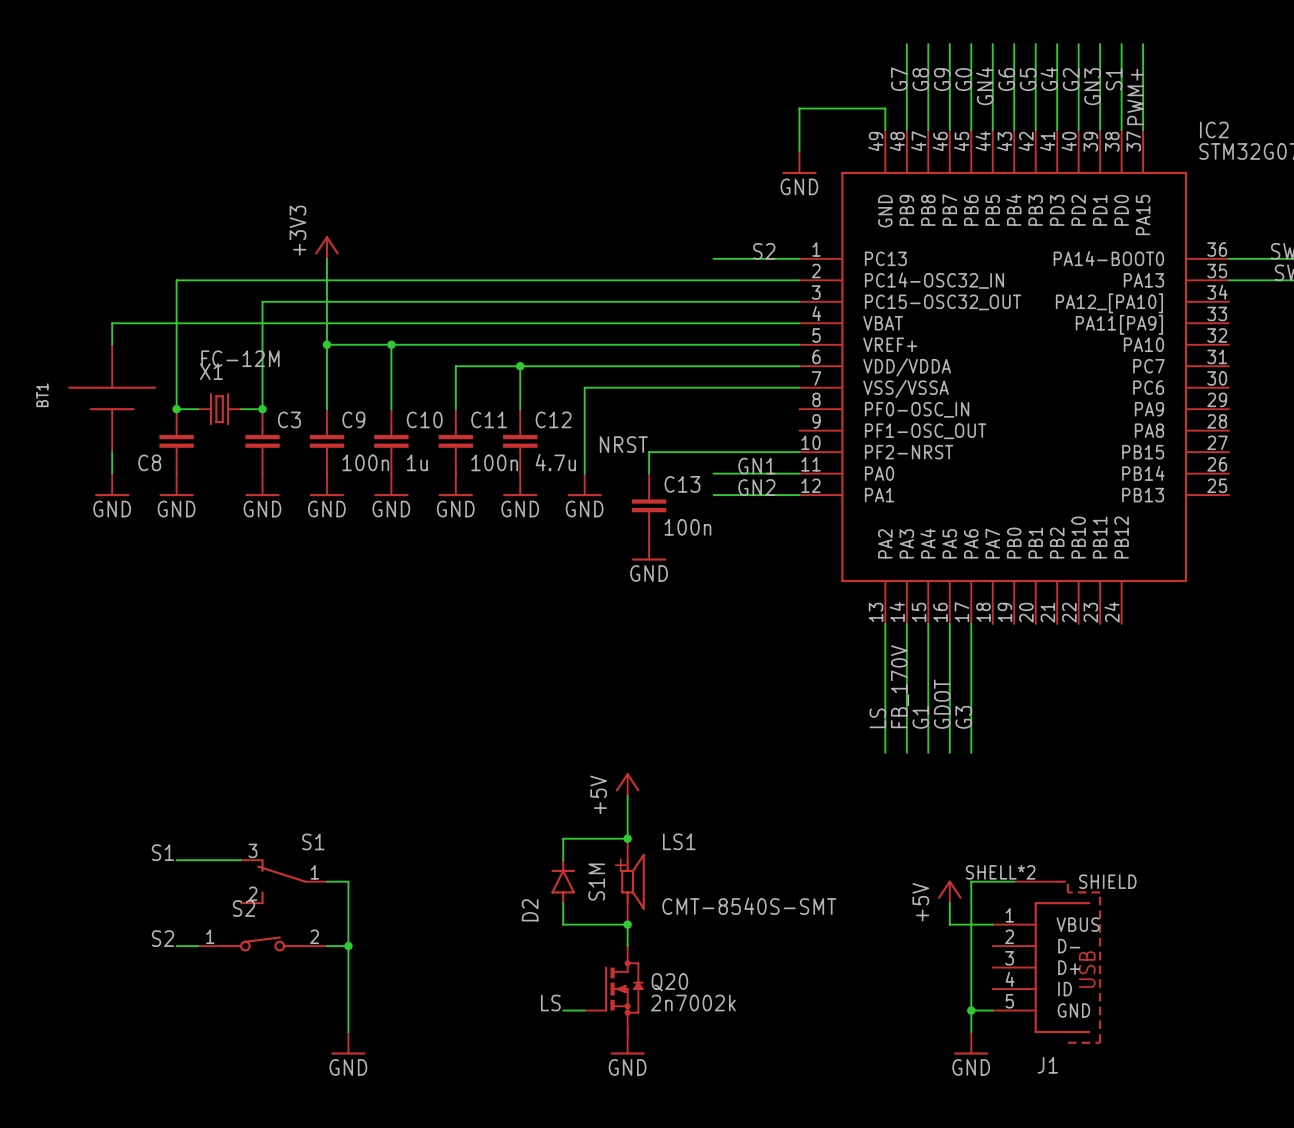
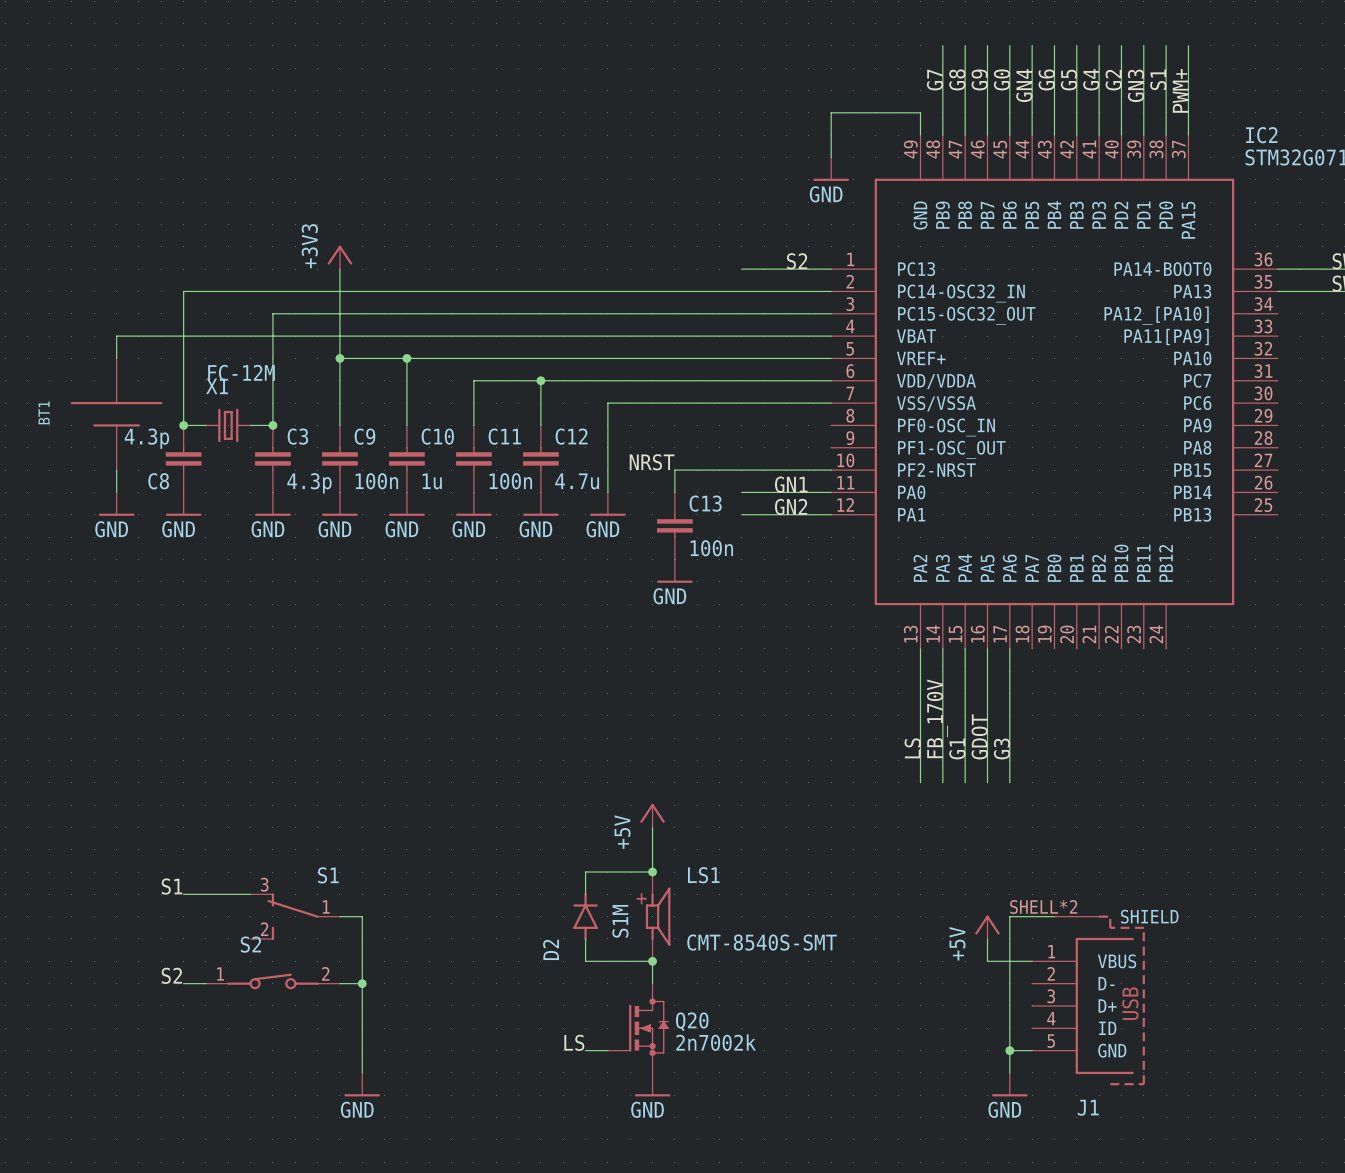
C8 value: none -> 4.3p (146, 438)
C3 value: none -> 4.3p (309, 483)

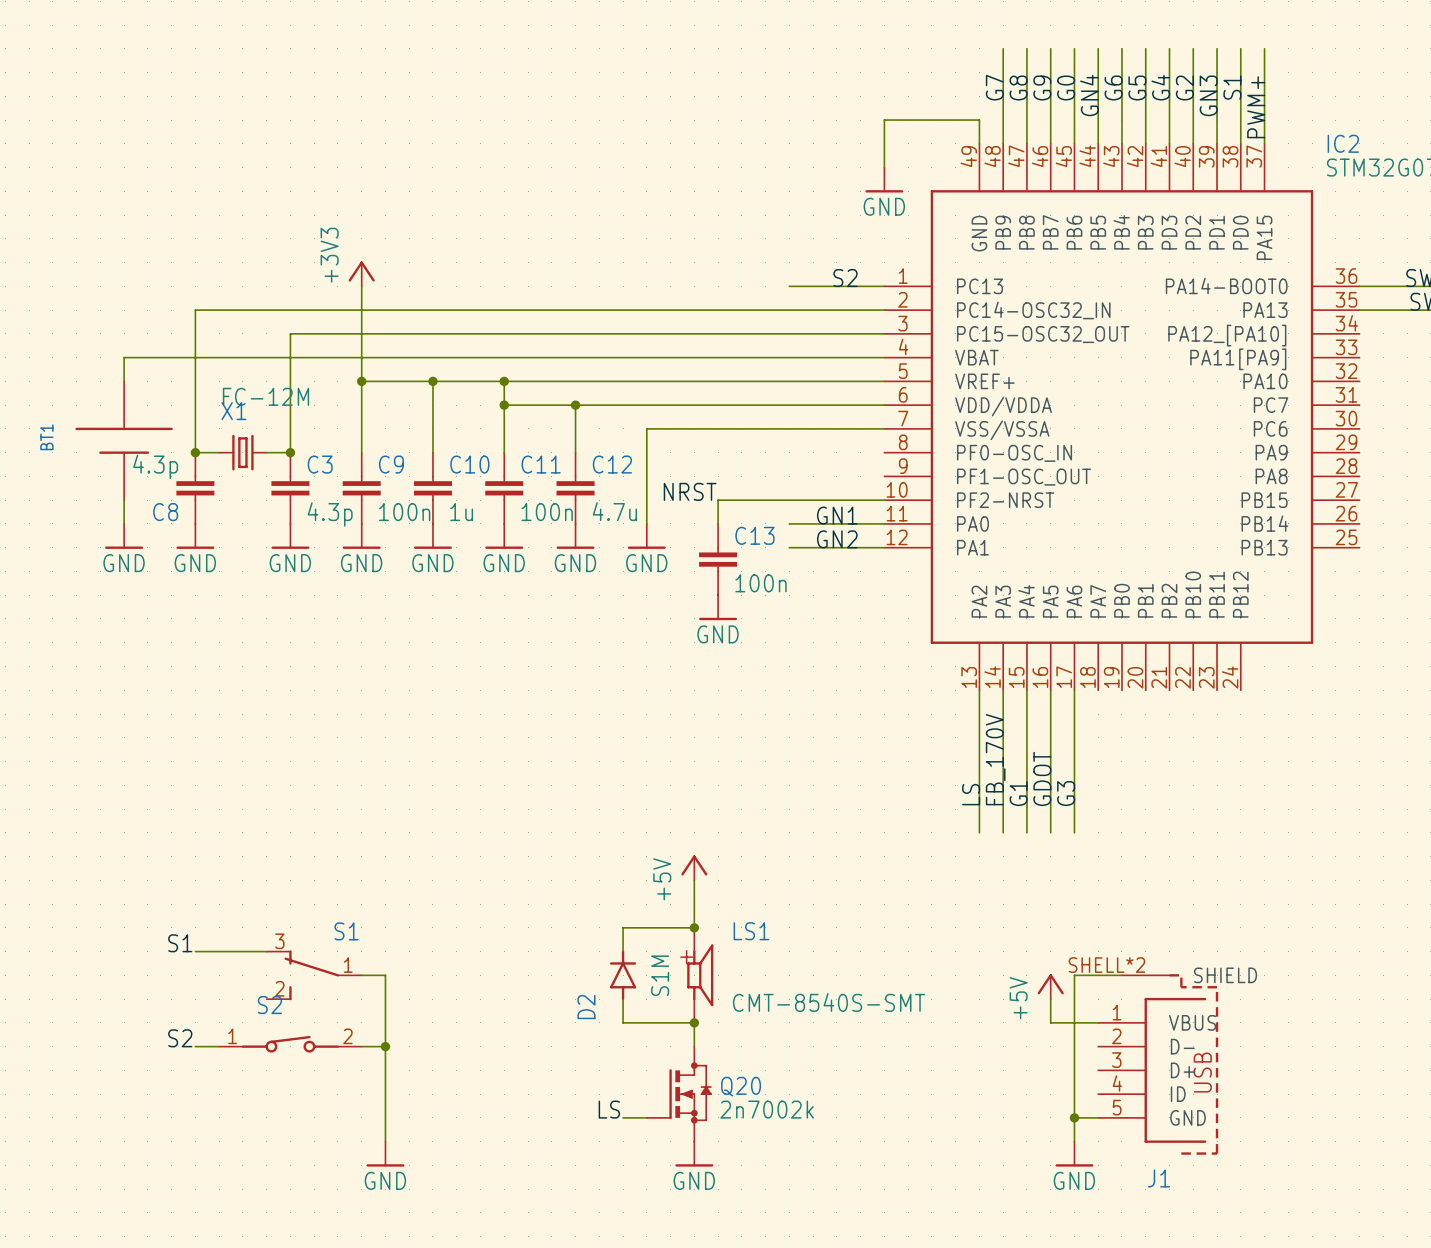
wire: none -> (504, 381) (504, 405)
junction: none -> (504, 381)
junction: none -> (504, 405)

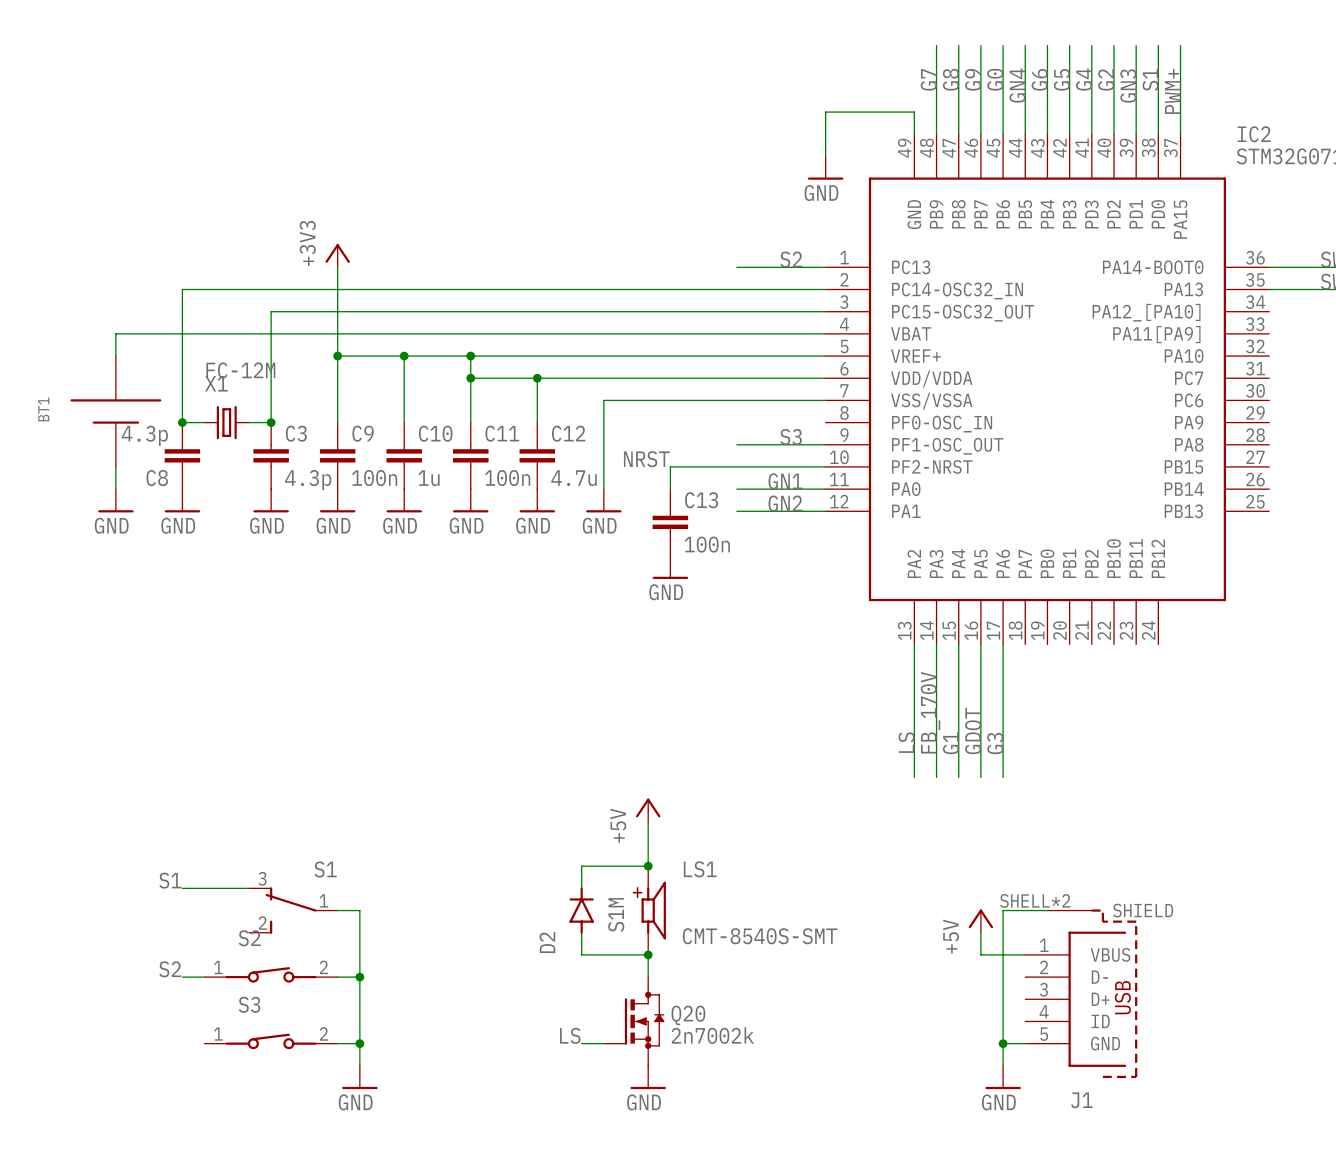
label: none -> S3 (791, 437)
wire: none -> (736, 444) (825, 444)
S3: none -> (271, 1041)
wire: none -> (337, 1043) (359, 1043)
junction: none -> (359, 1043)

